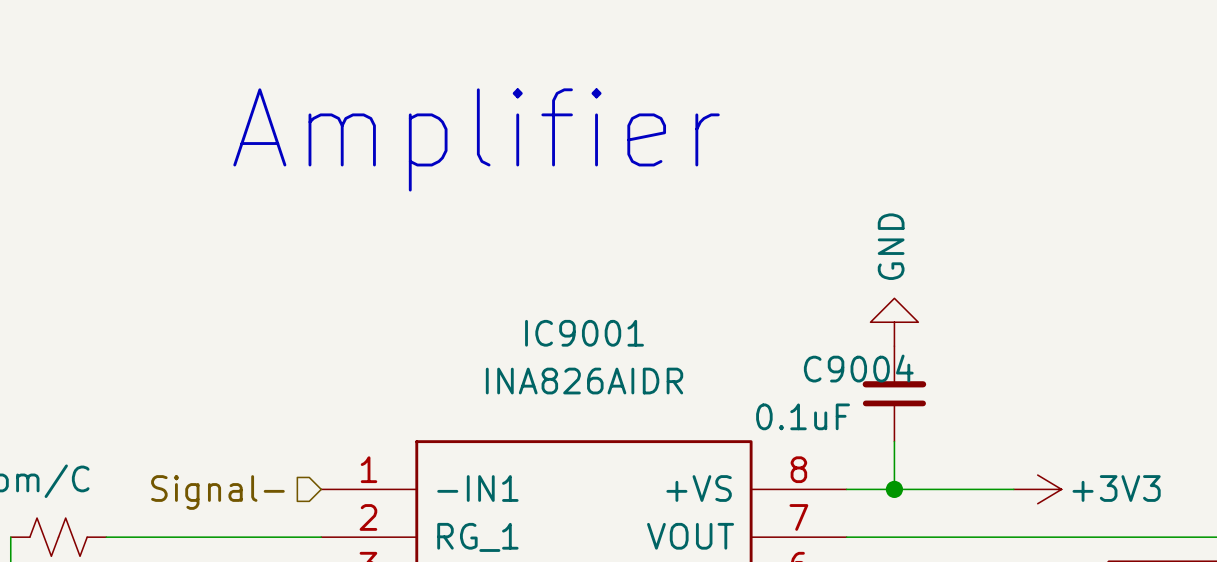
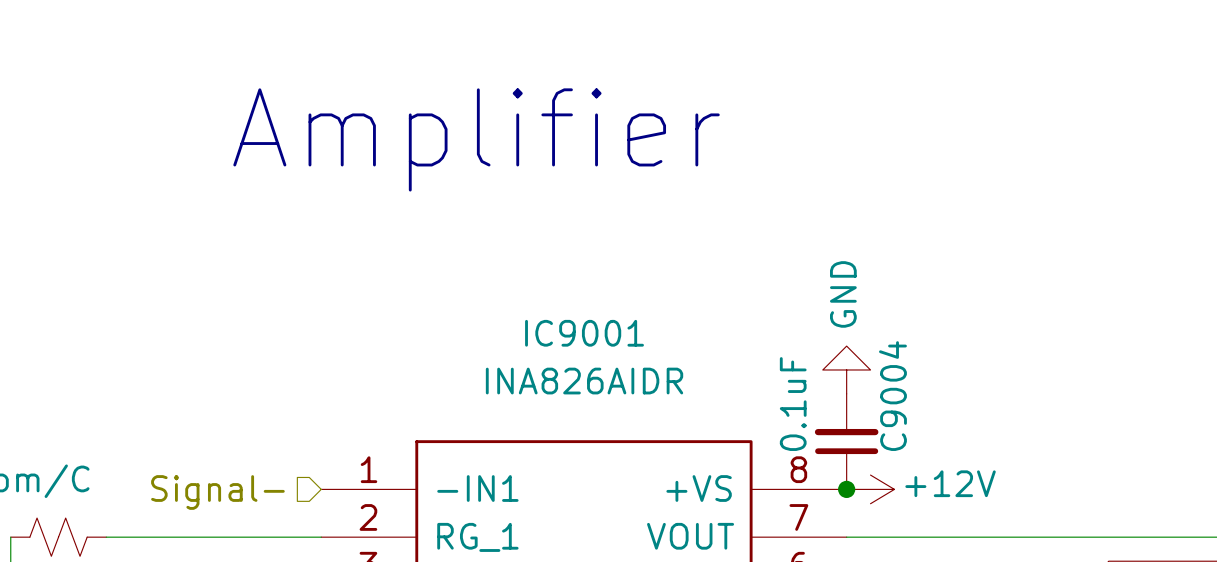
power symbol position: GND (894, 322) -> GND (846, 369)
C9004 name rotation: 0° (858, 368) -> 90° counterclockwise (892, 396)
C9004 position: (894, 393) -> (846, 441)
C9004 value rotation: 0° (803, 416) -> 90° counterclockwise (793, 404)
wire: (894, 441) (894, 489) -> none
wire: (846, 489) (1013, 489) -> none
power symbol: none -> +12V (870, 489)
junction position: (894, 489) -> (846, 489)
power symbol: +3V3 (1037, 489) -> none

